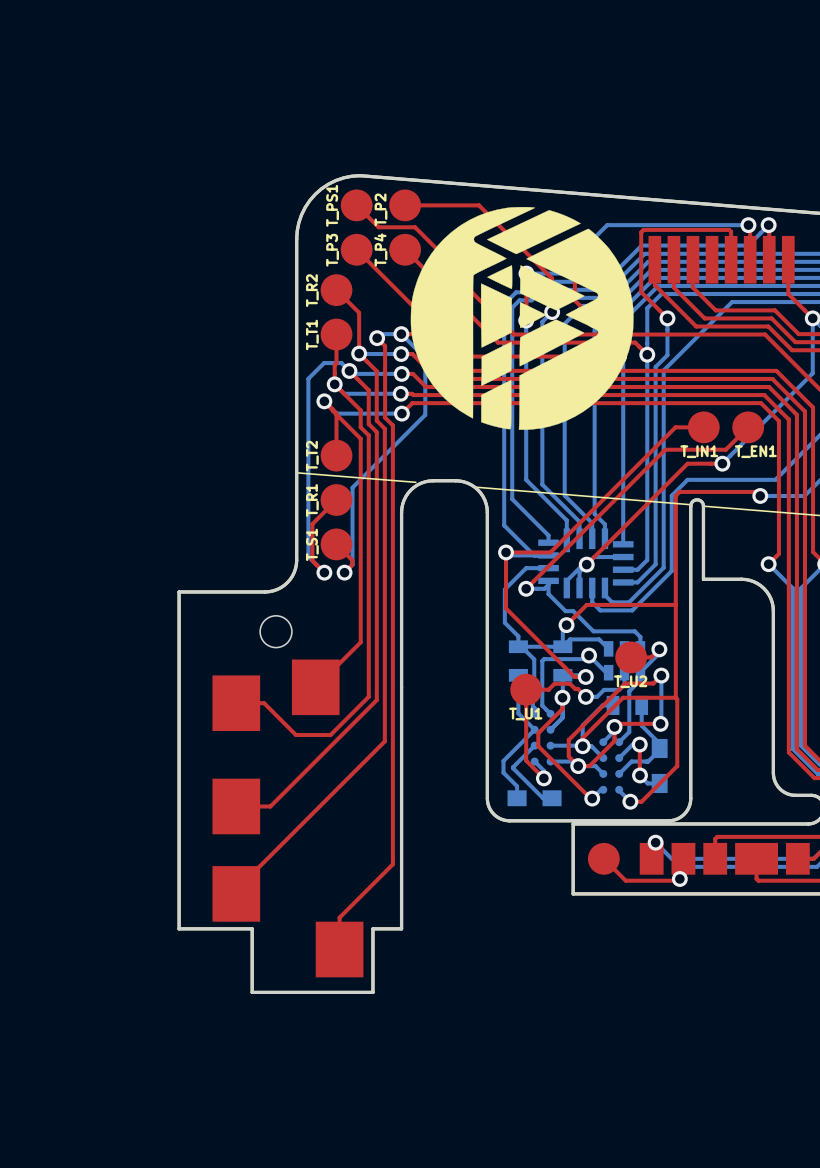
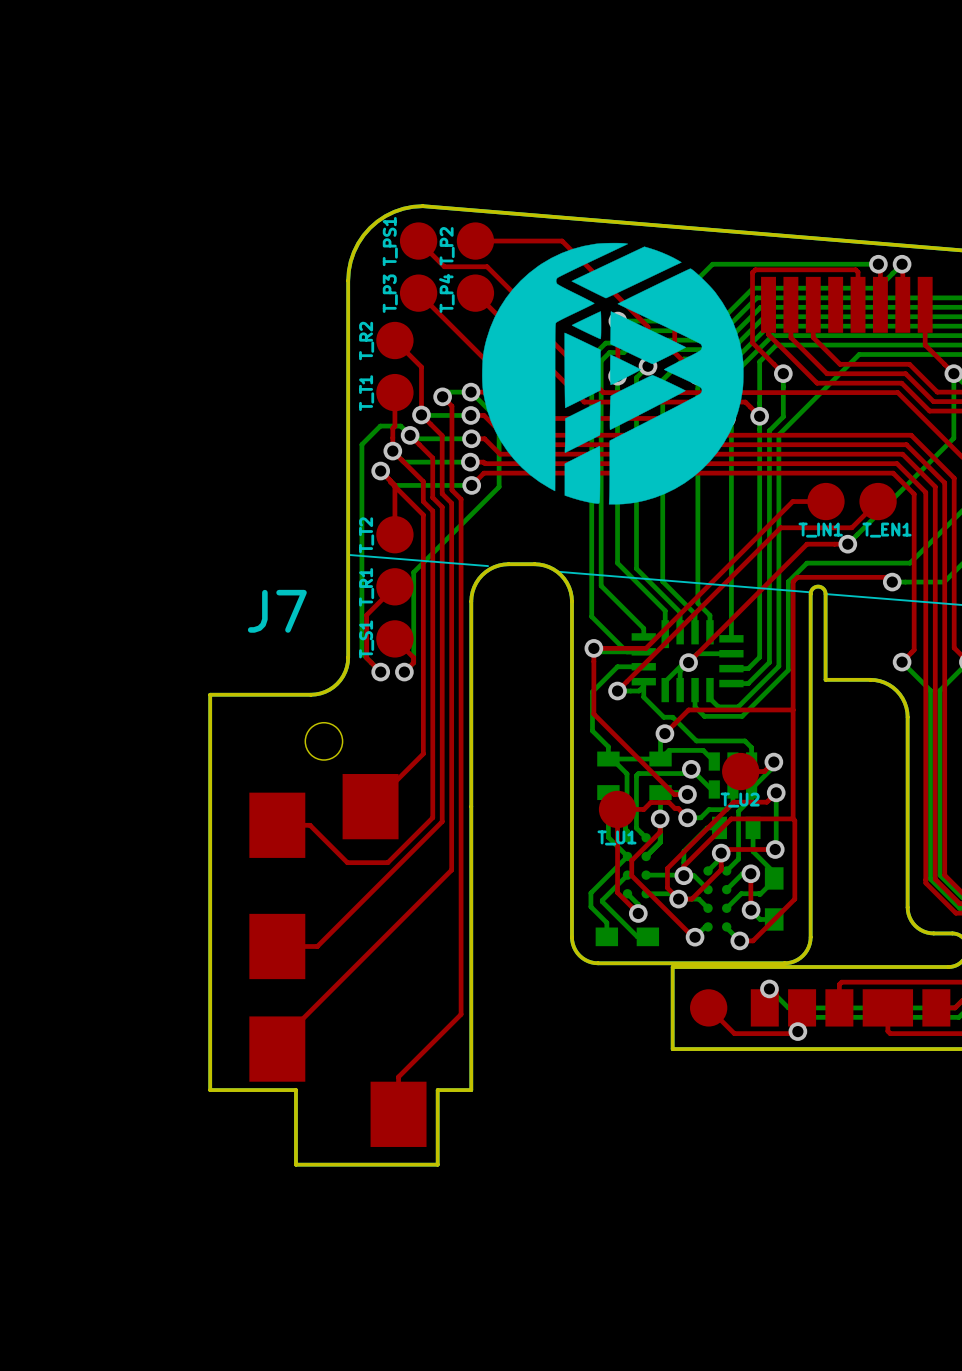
J7 name: none -> J7 (277, 611)

